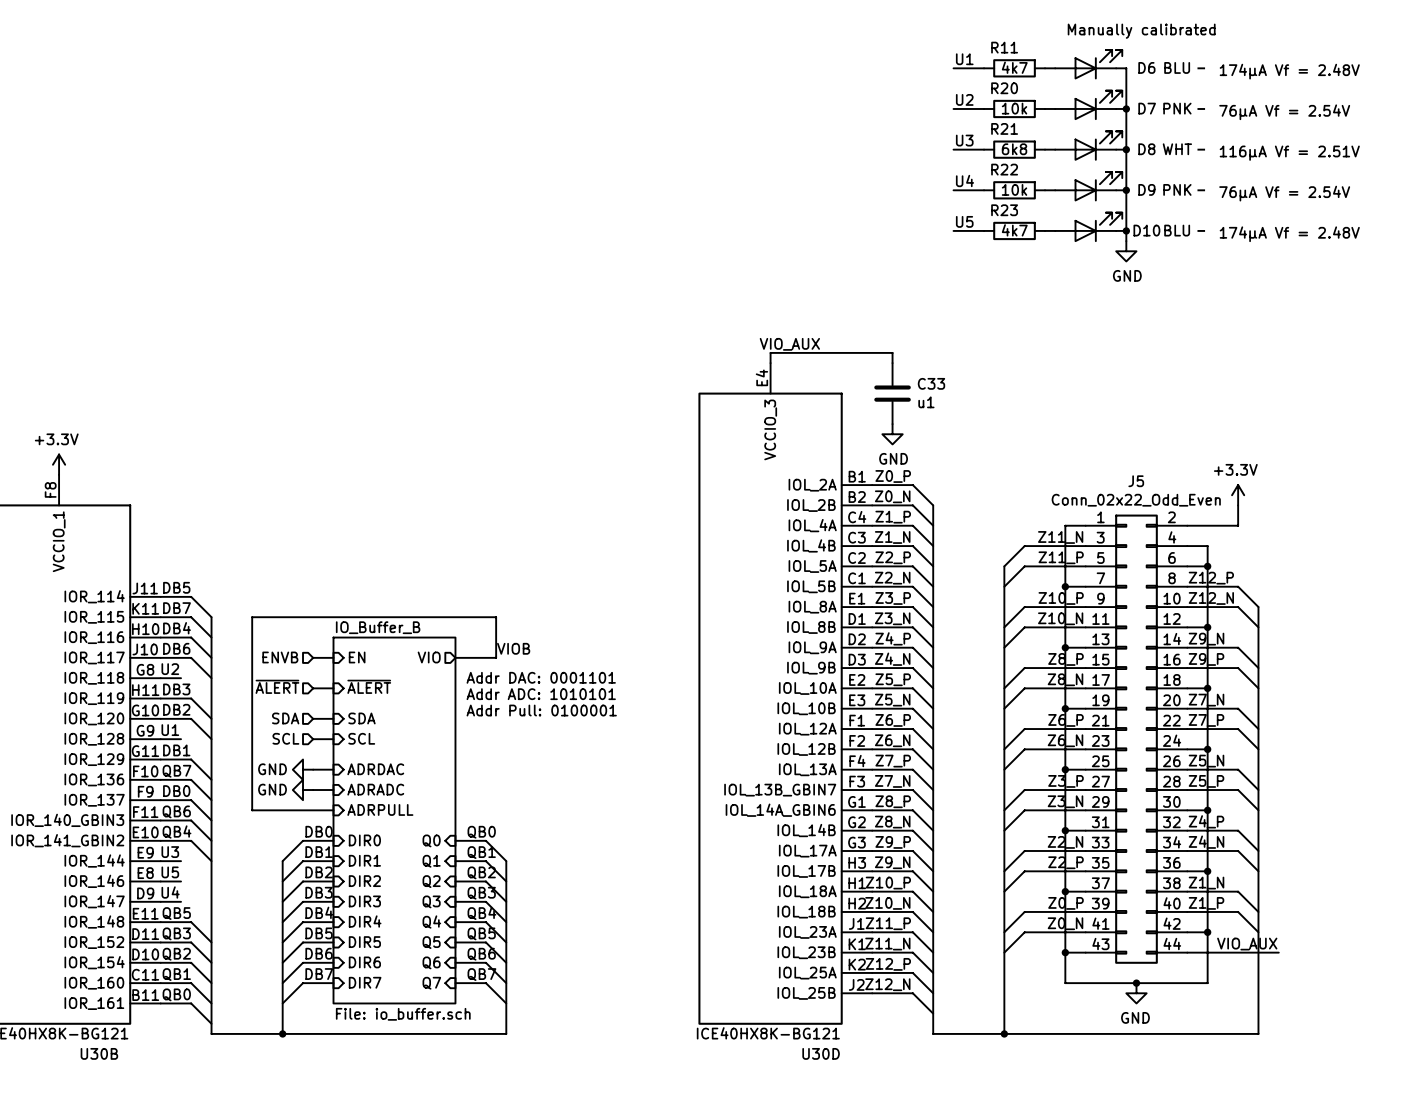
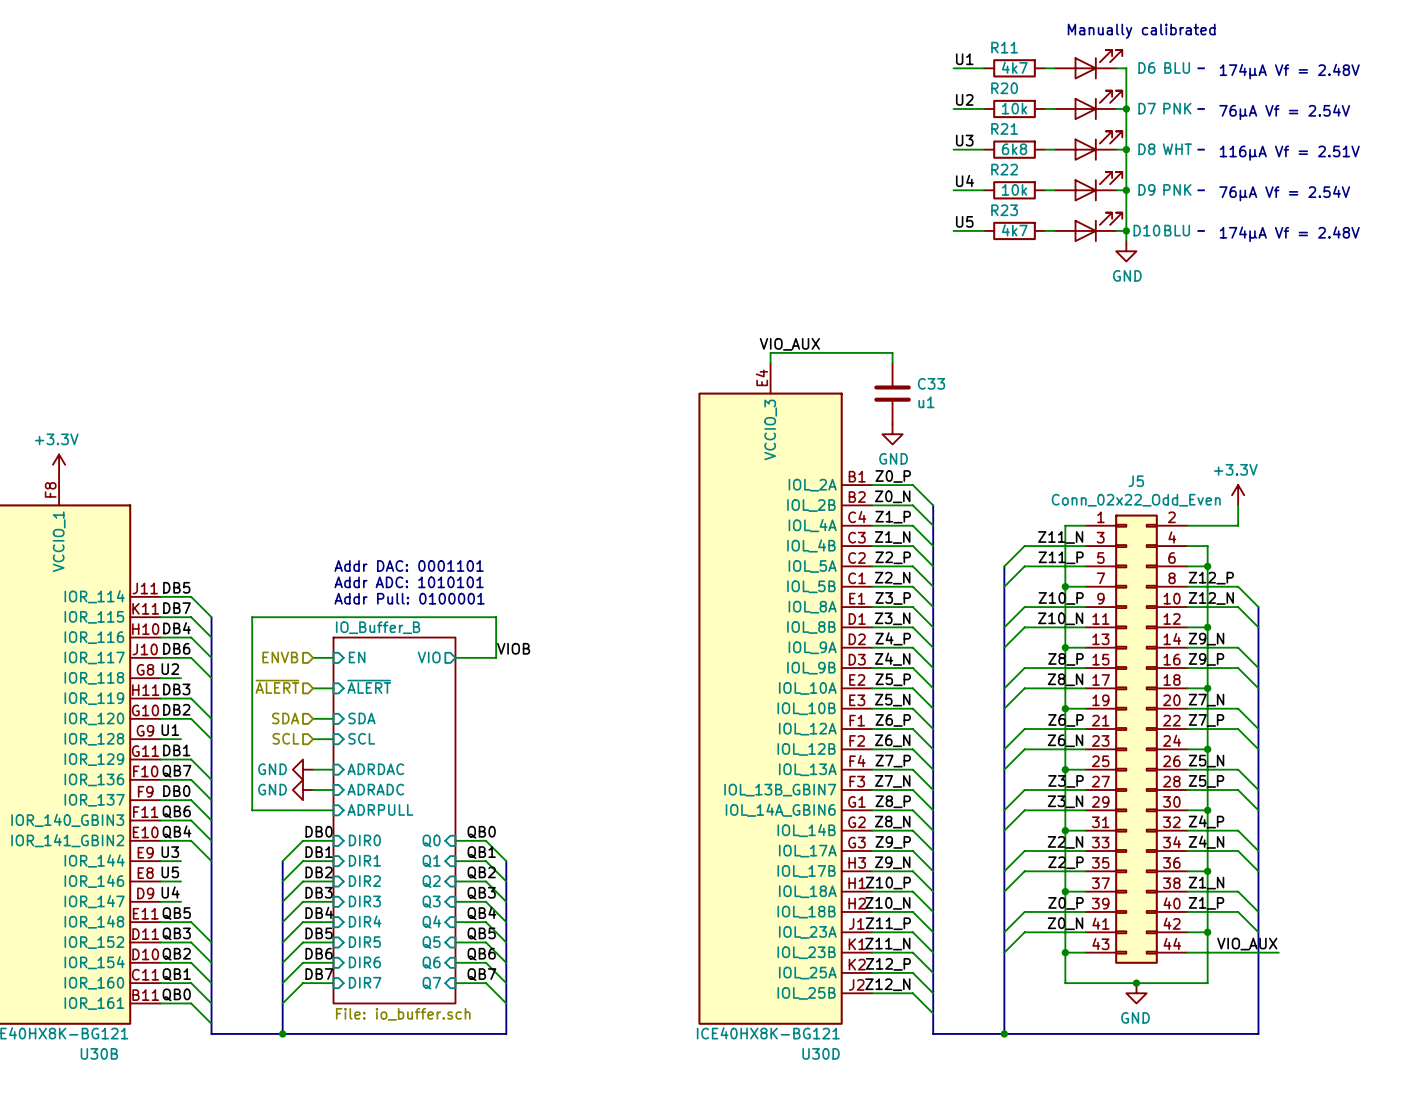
text position: Addr DAC: 0001101 (541, 677) -> Addr DAC: 0001101 (409, 565)
text position: Addr ADC: 1010101 (541, 694) -> Addr ADC: 1010101 (409, 582)
text position: Addr Pull: 0100001 (541, 710) -> Addr Pull: 0100001 (409, 598)

